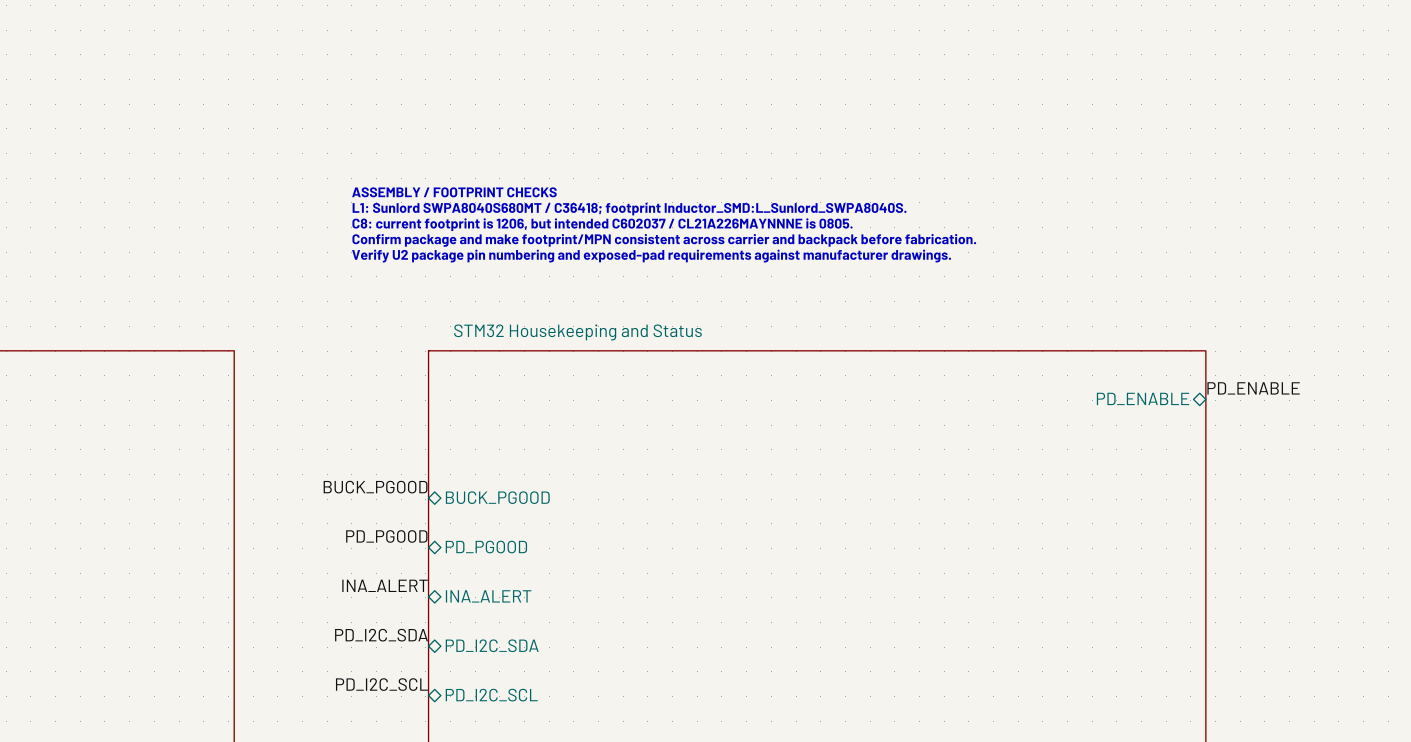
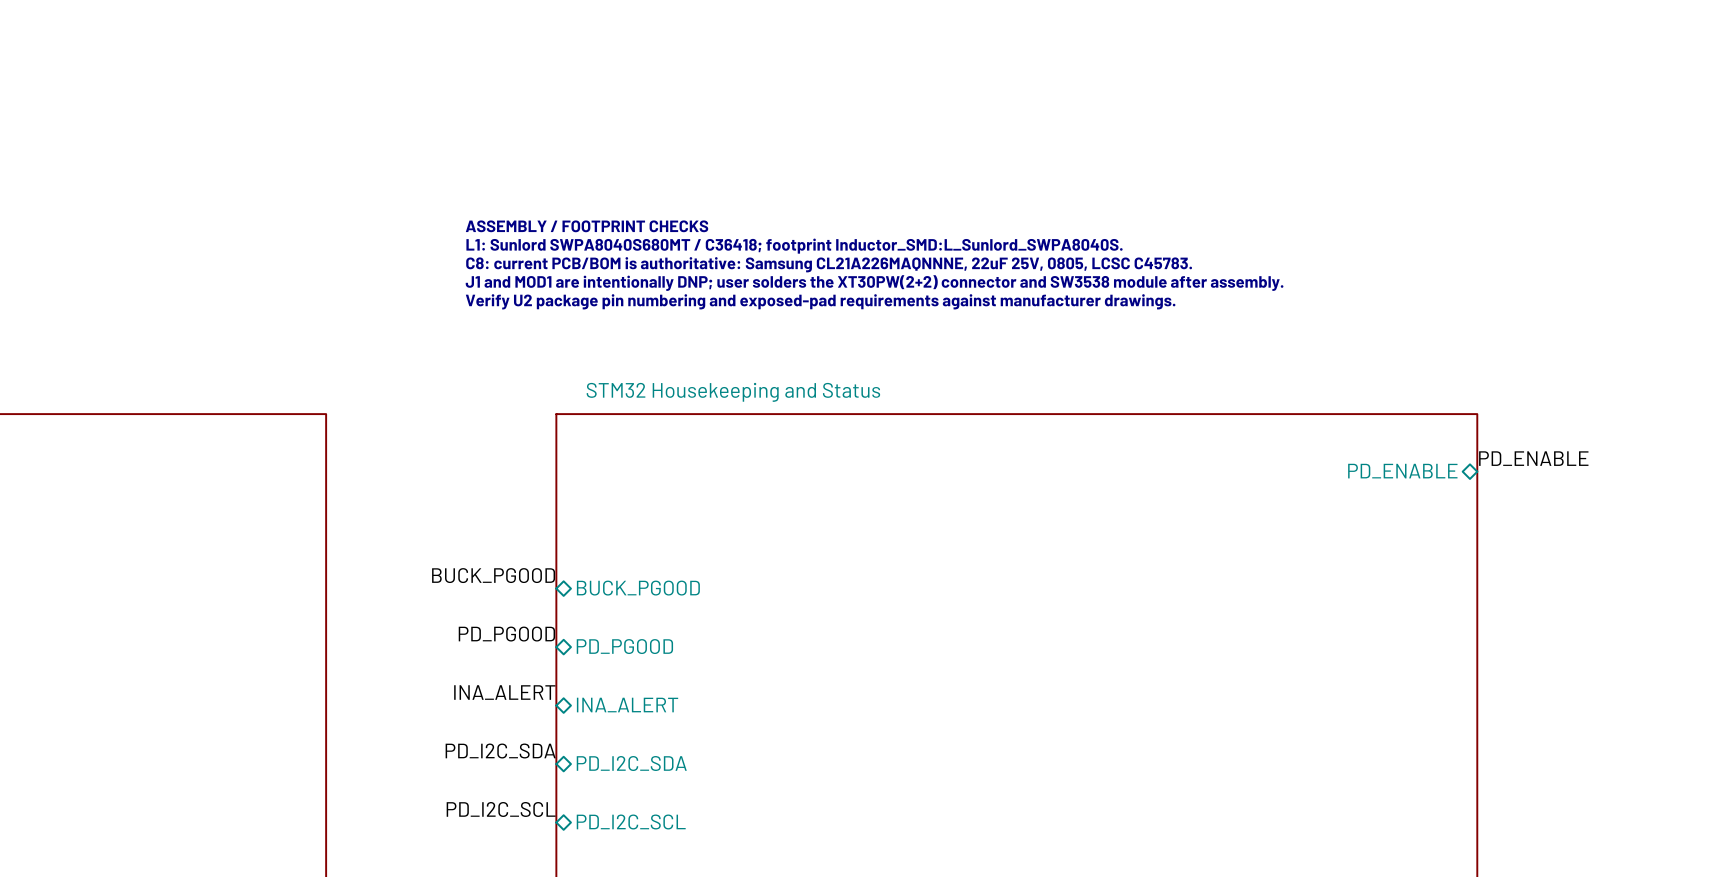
text: C8: current footprint is 1206, but intended C602037 / CL21A226MAYNNNE is 0805. (602, 224) -> C8: current PCB/BOM is authoritative: Samsung CL21A226MAQNNNE, 22uF 25V, 0805, LCSC C45783. (829, 264)
text: Confirm package and make footprint/MPN consistent across carrier and backpack before fabrication. (664, 240) -> J1 and MOD1 are intentionally DNP; user solders the XT30PW(2+2) connector and SW3538 module after assembly. (874, 283)

